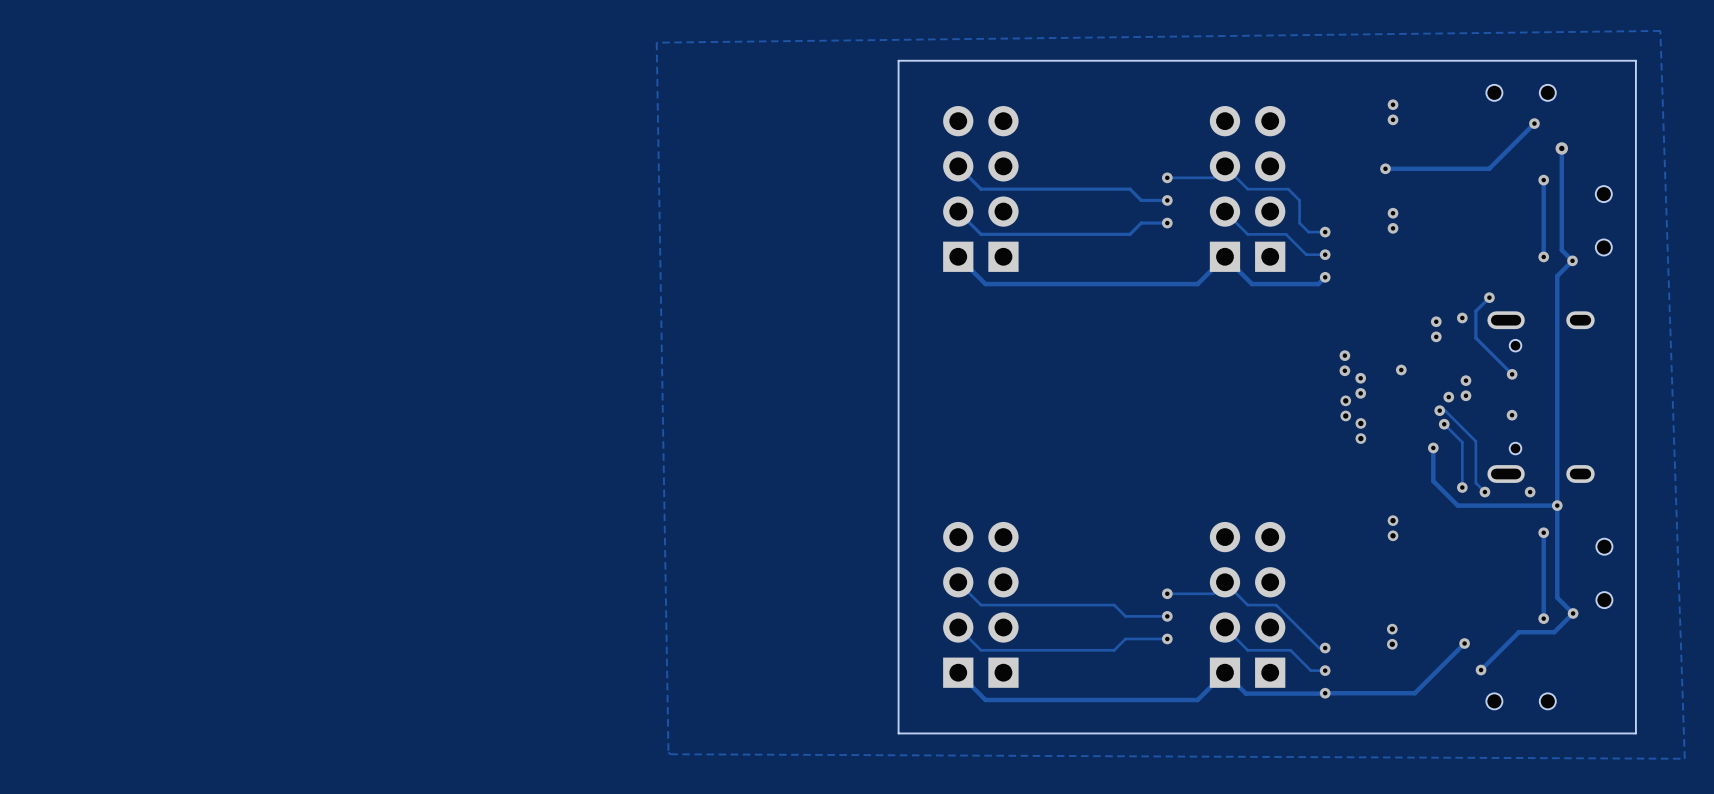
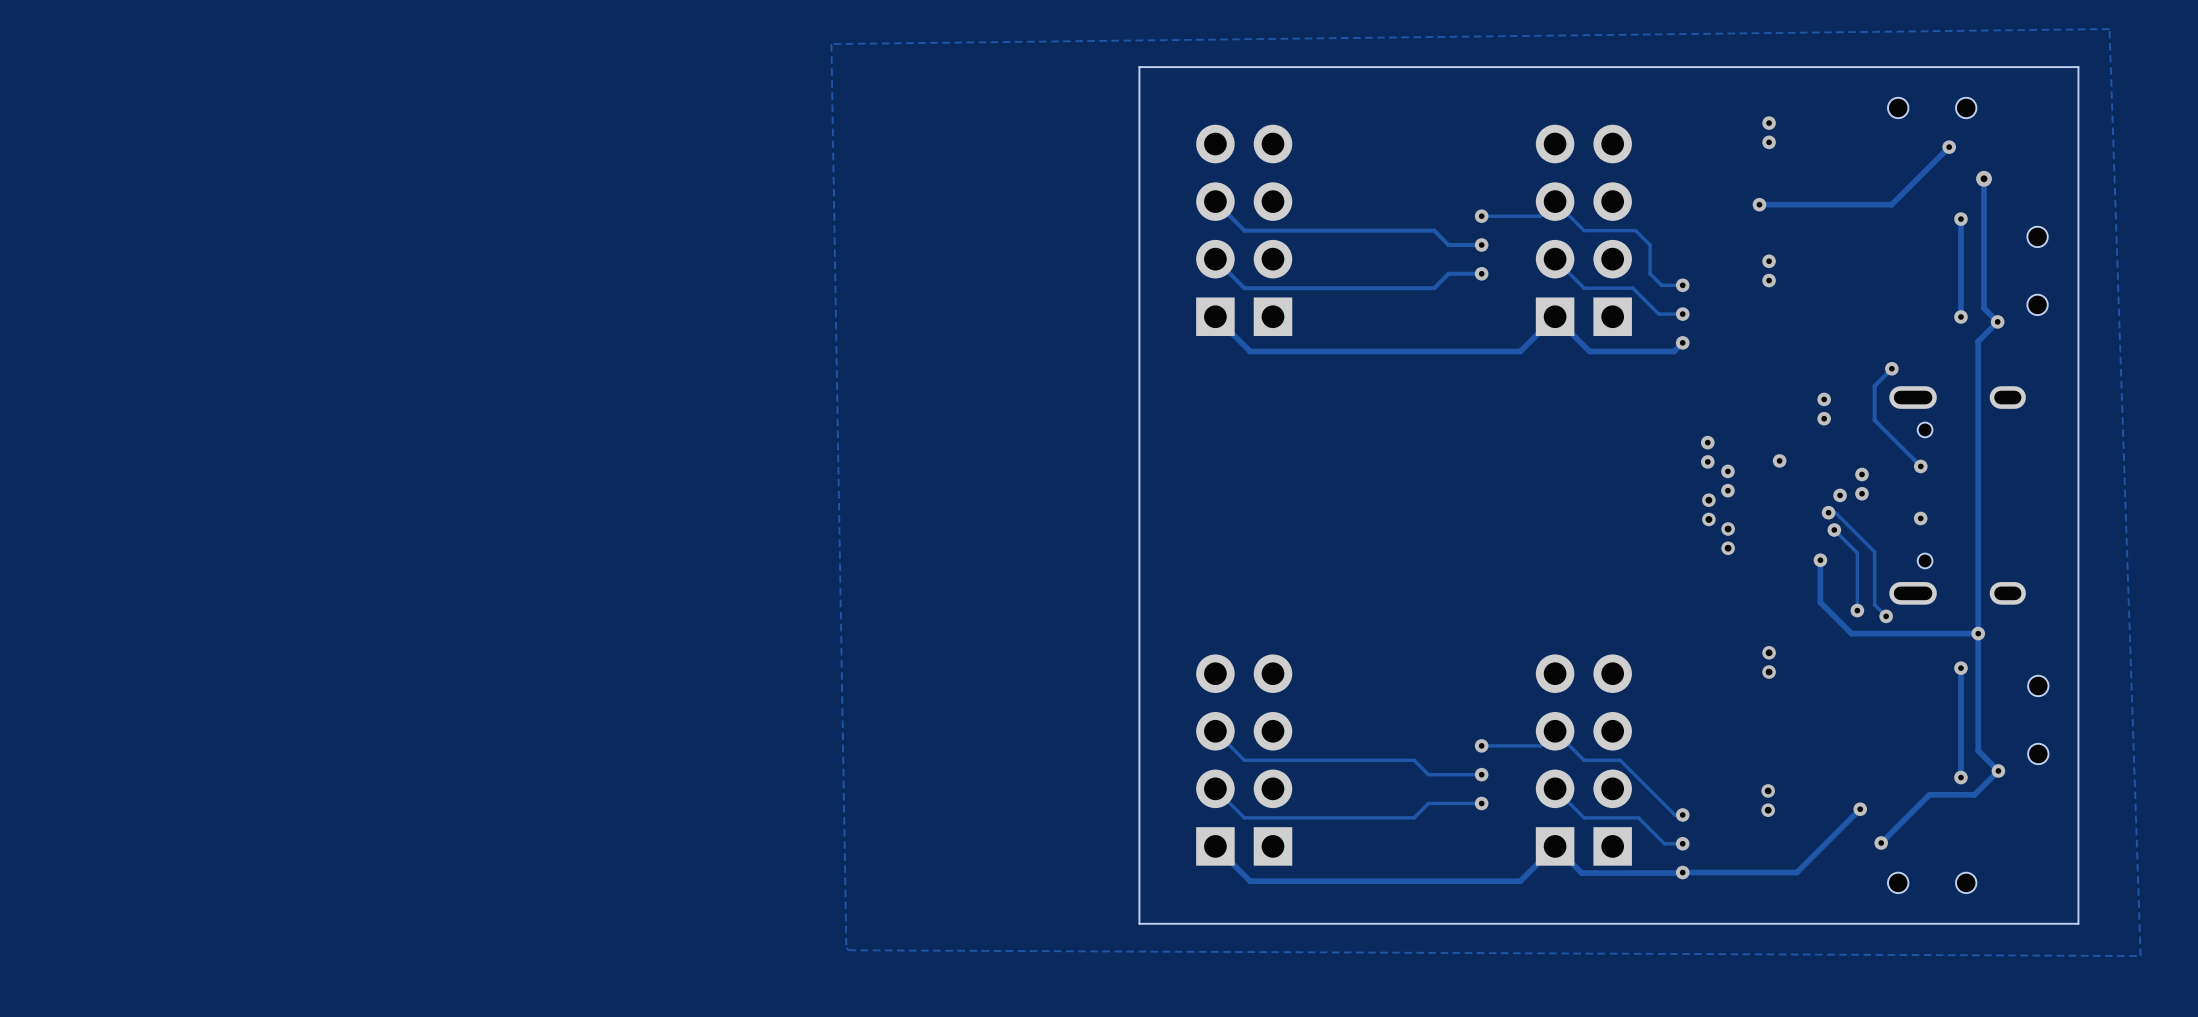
via: (1462, 317) -> none
via: (1530, 492) -> none

